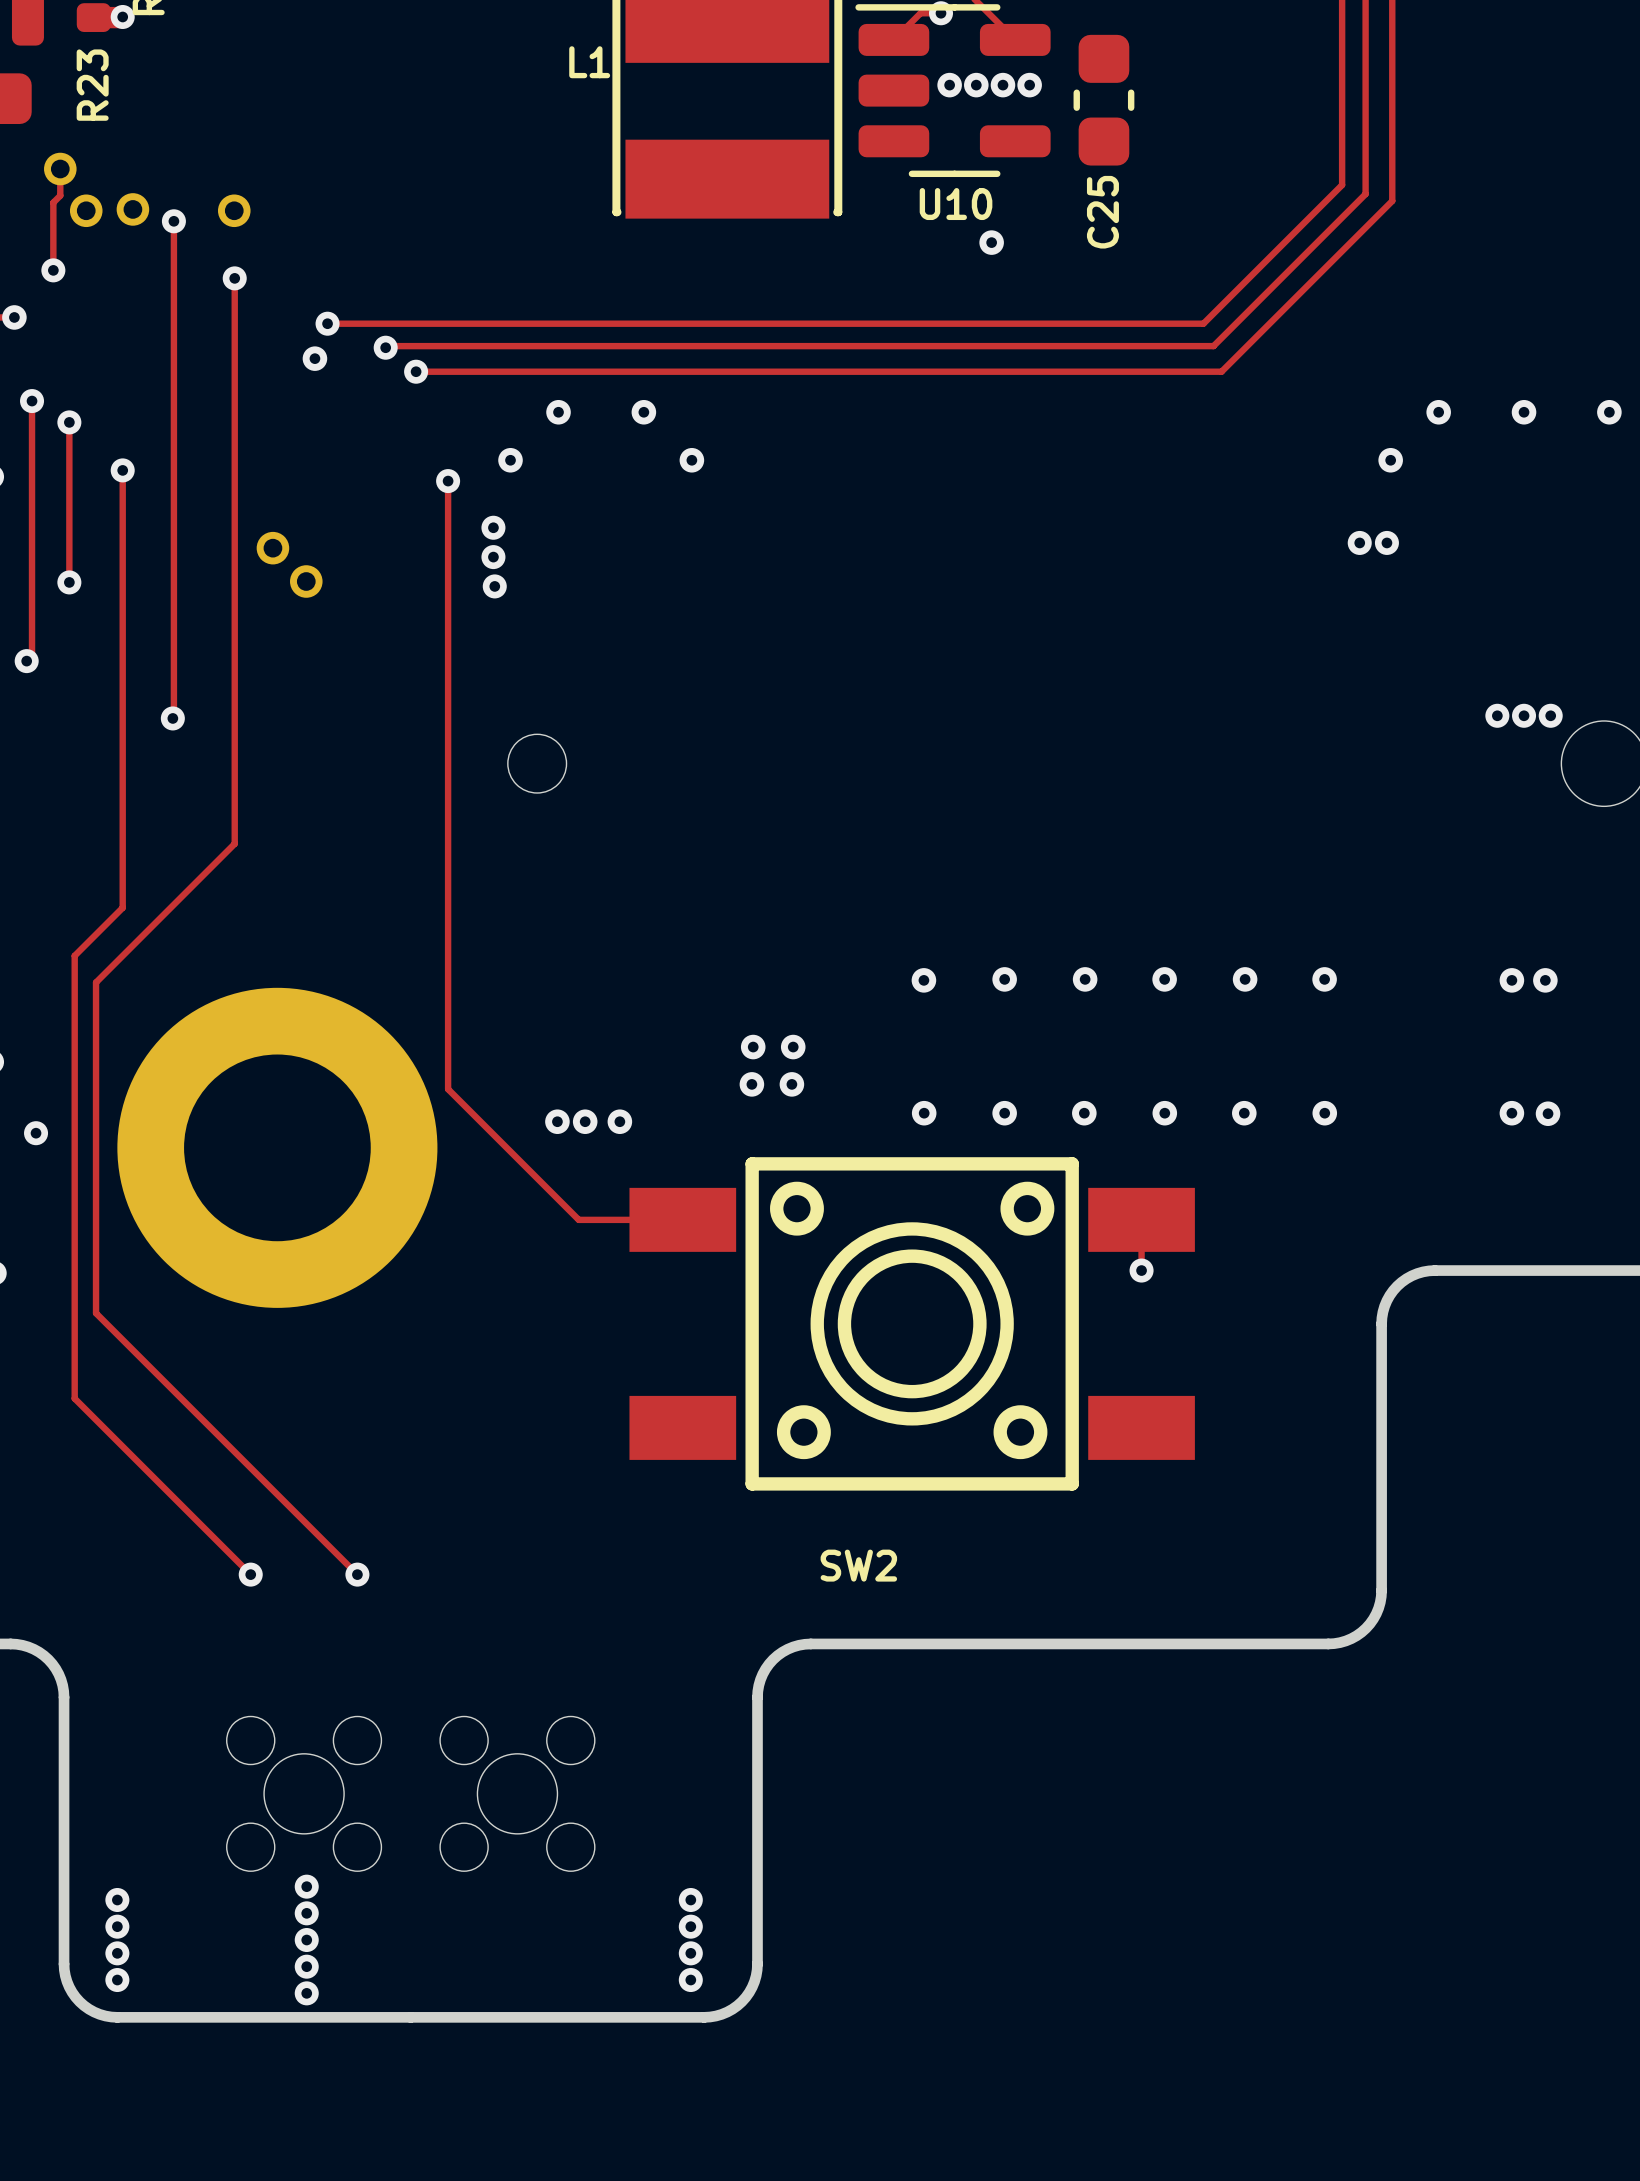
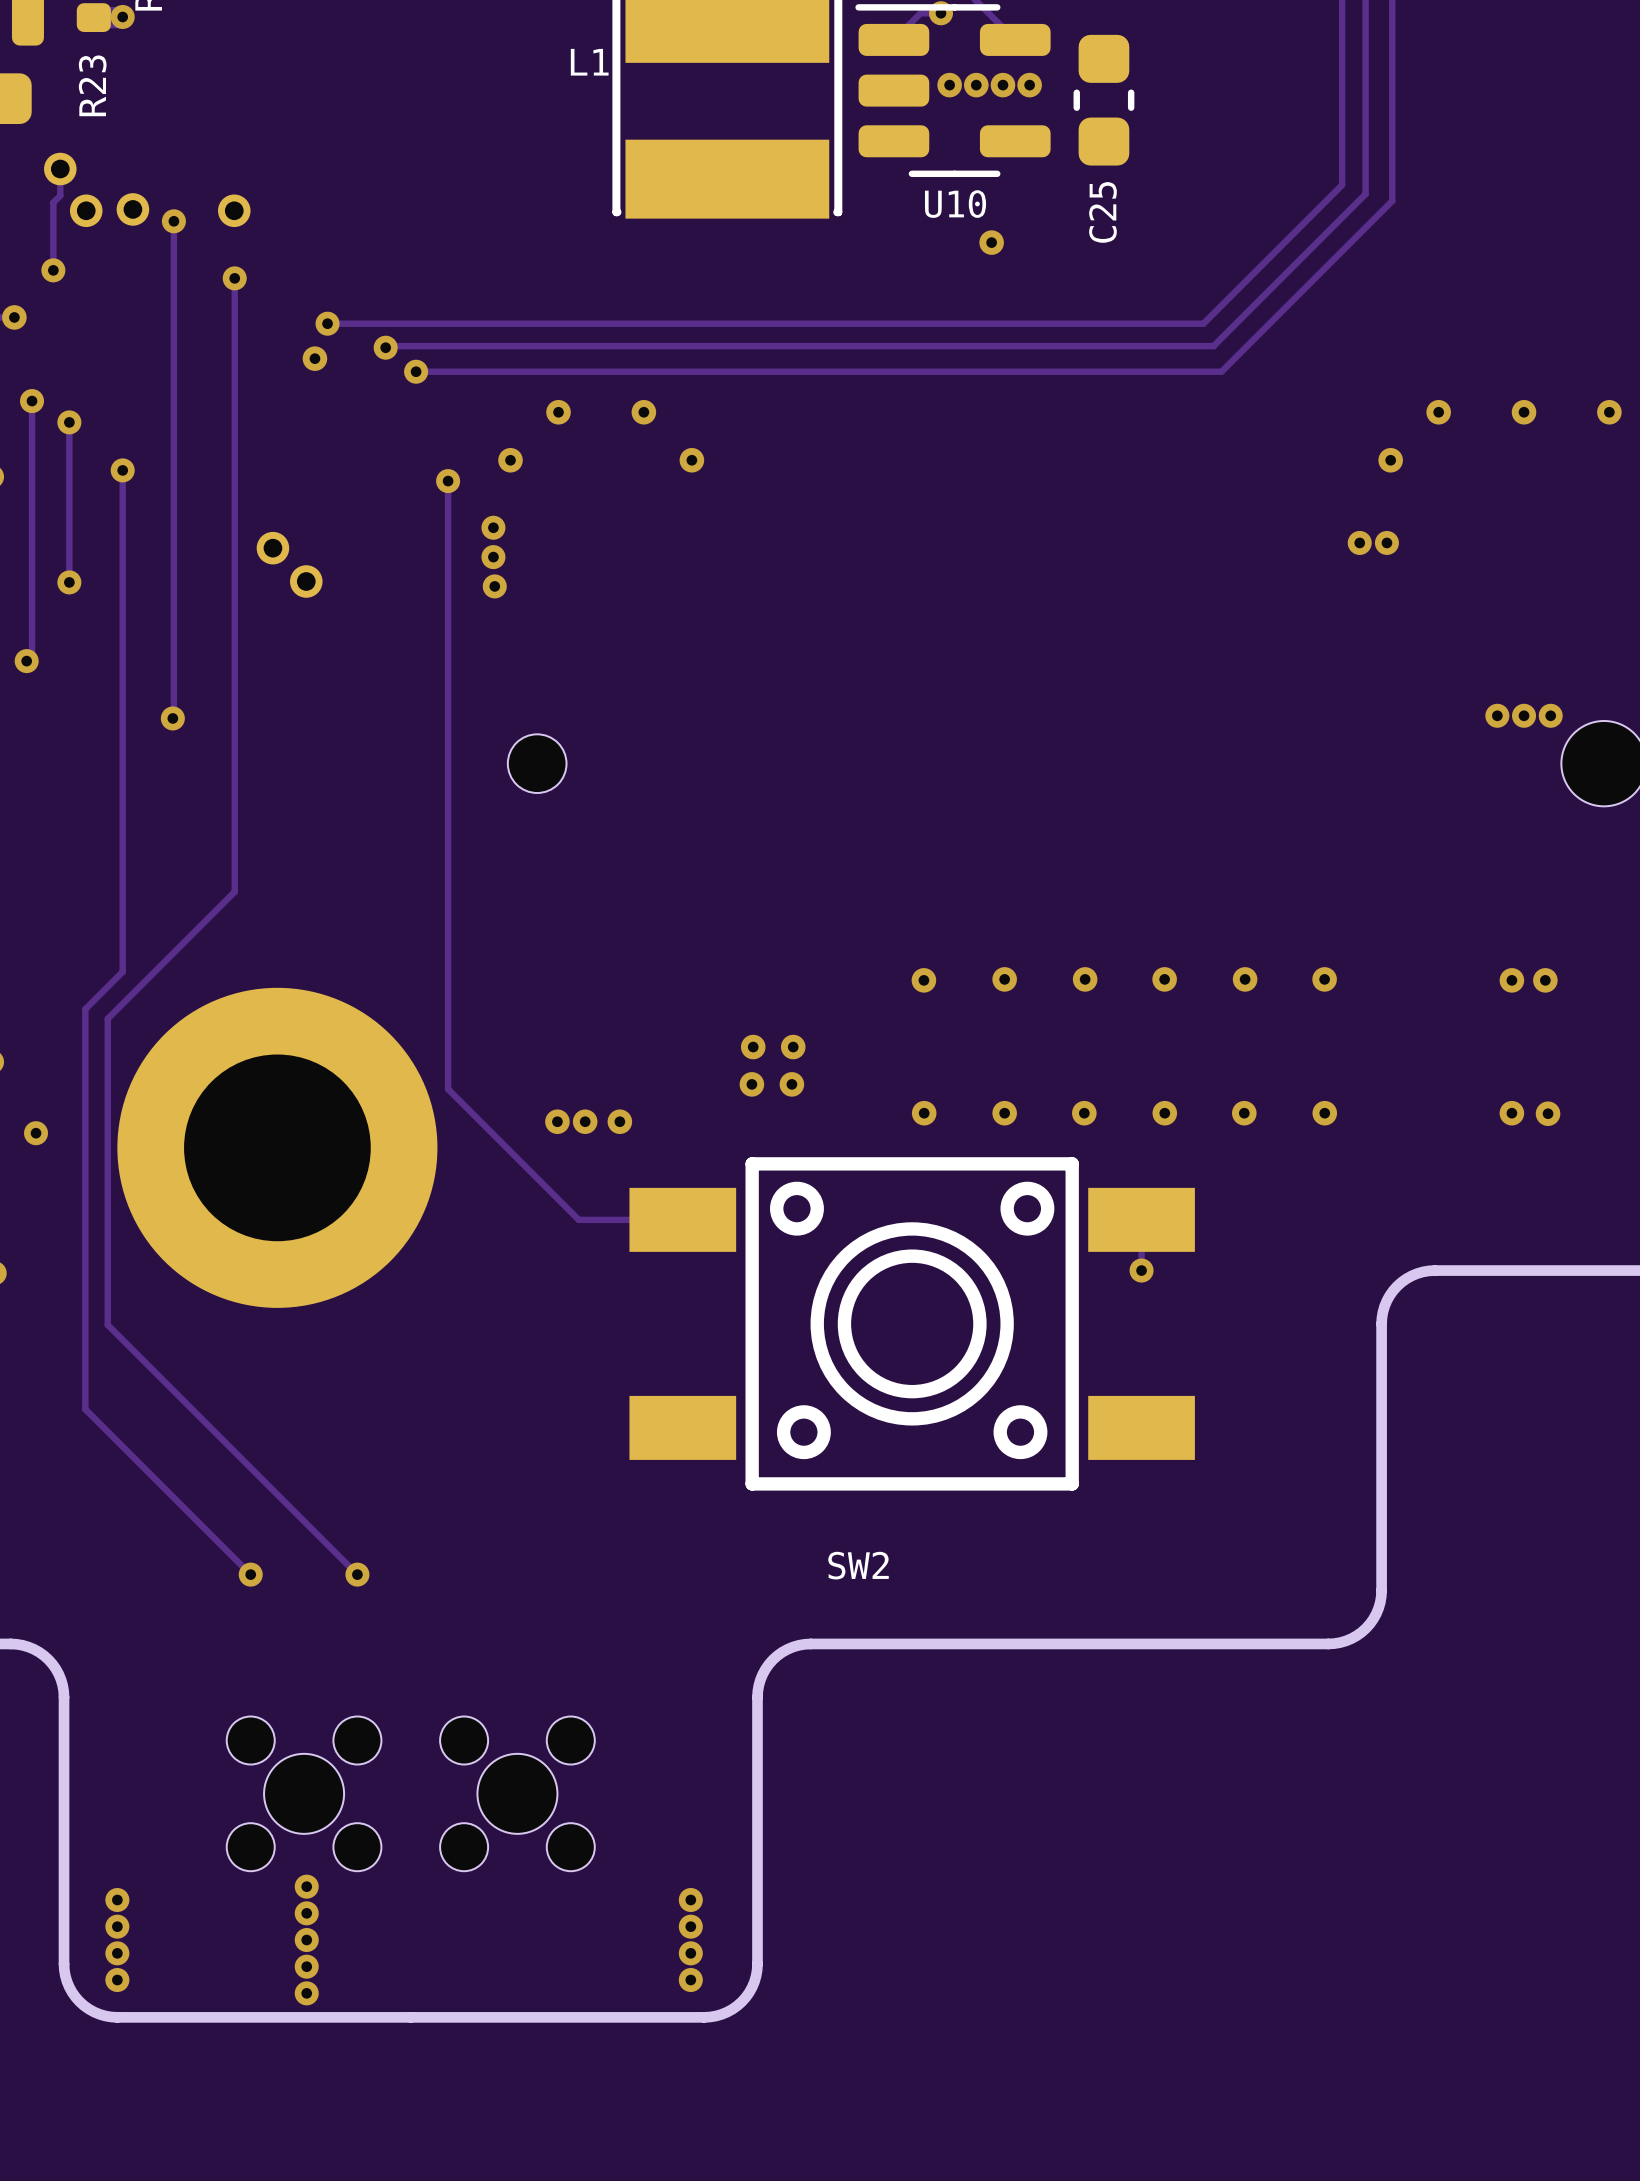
track: (234, 843) (96, 982) (96, 1313) (107, 1324) -> (234, 843) (234, 891) (107, 1018) (107, 1324)
track: (122, 907) (74, 955) (74, 1398) (85, 1409) -> (122, 907) (122, 971) (85, 1009) (85, 1409)

